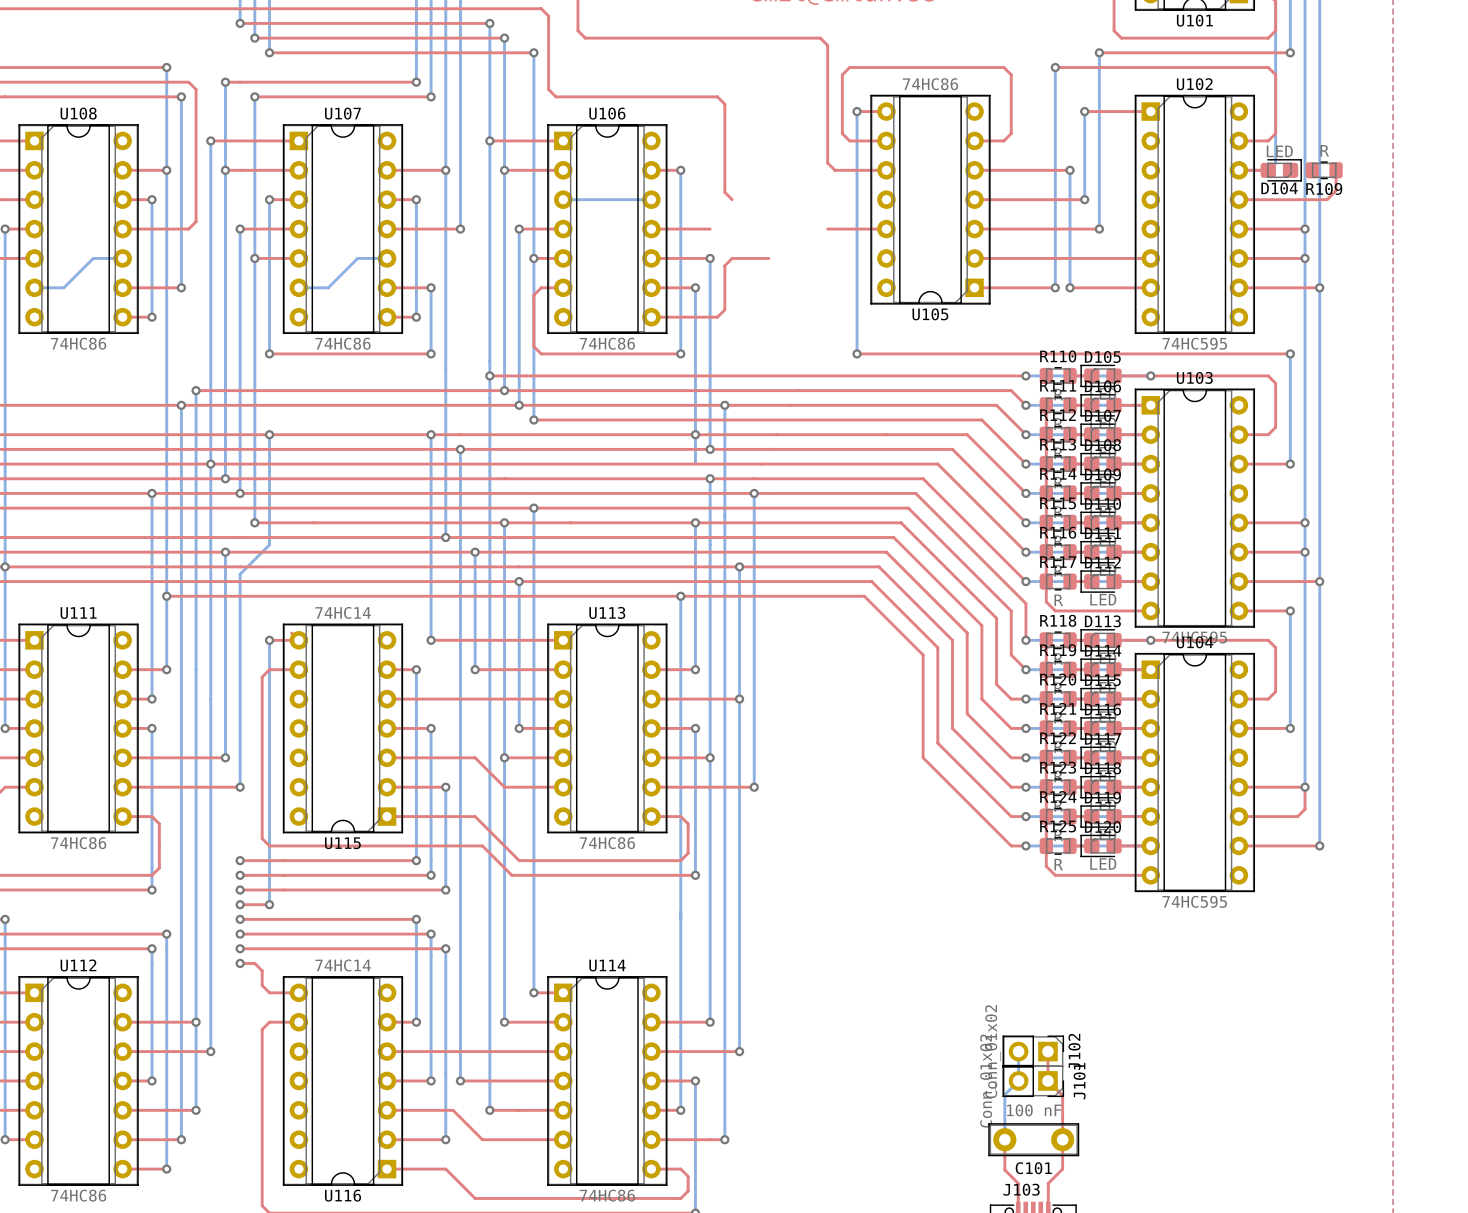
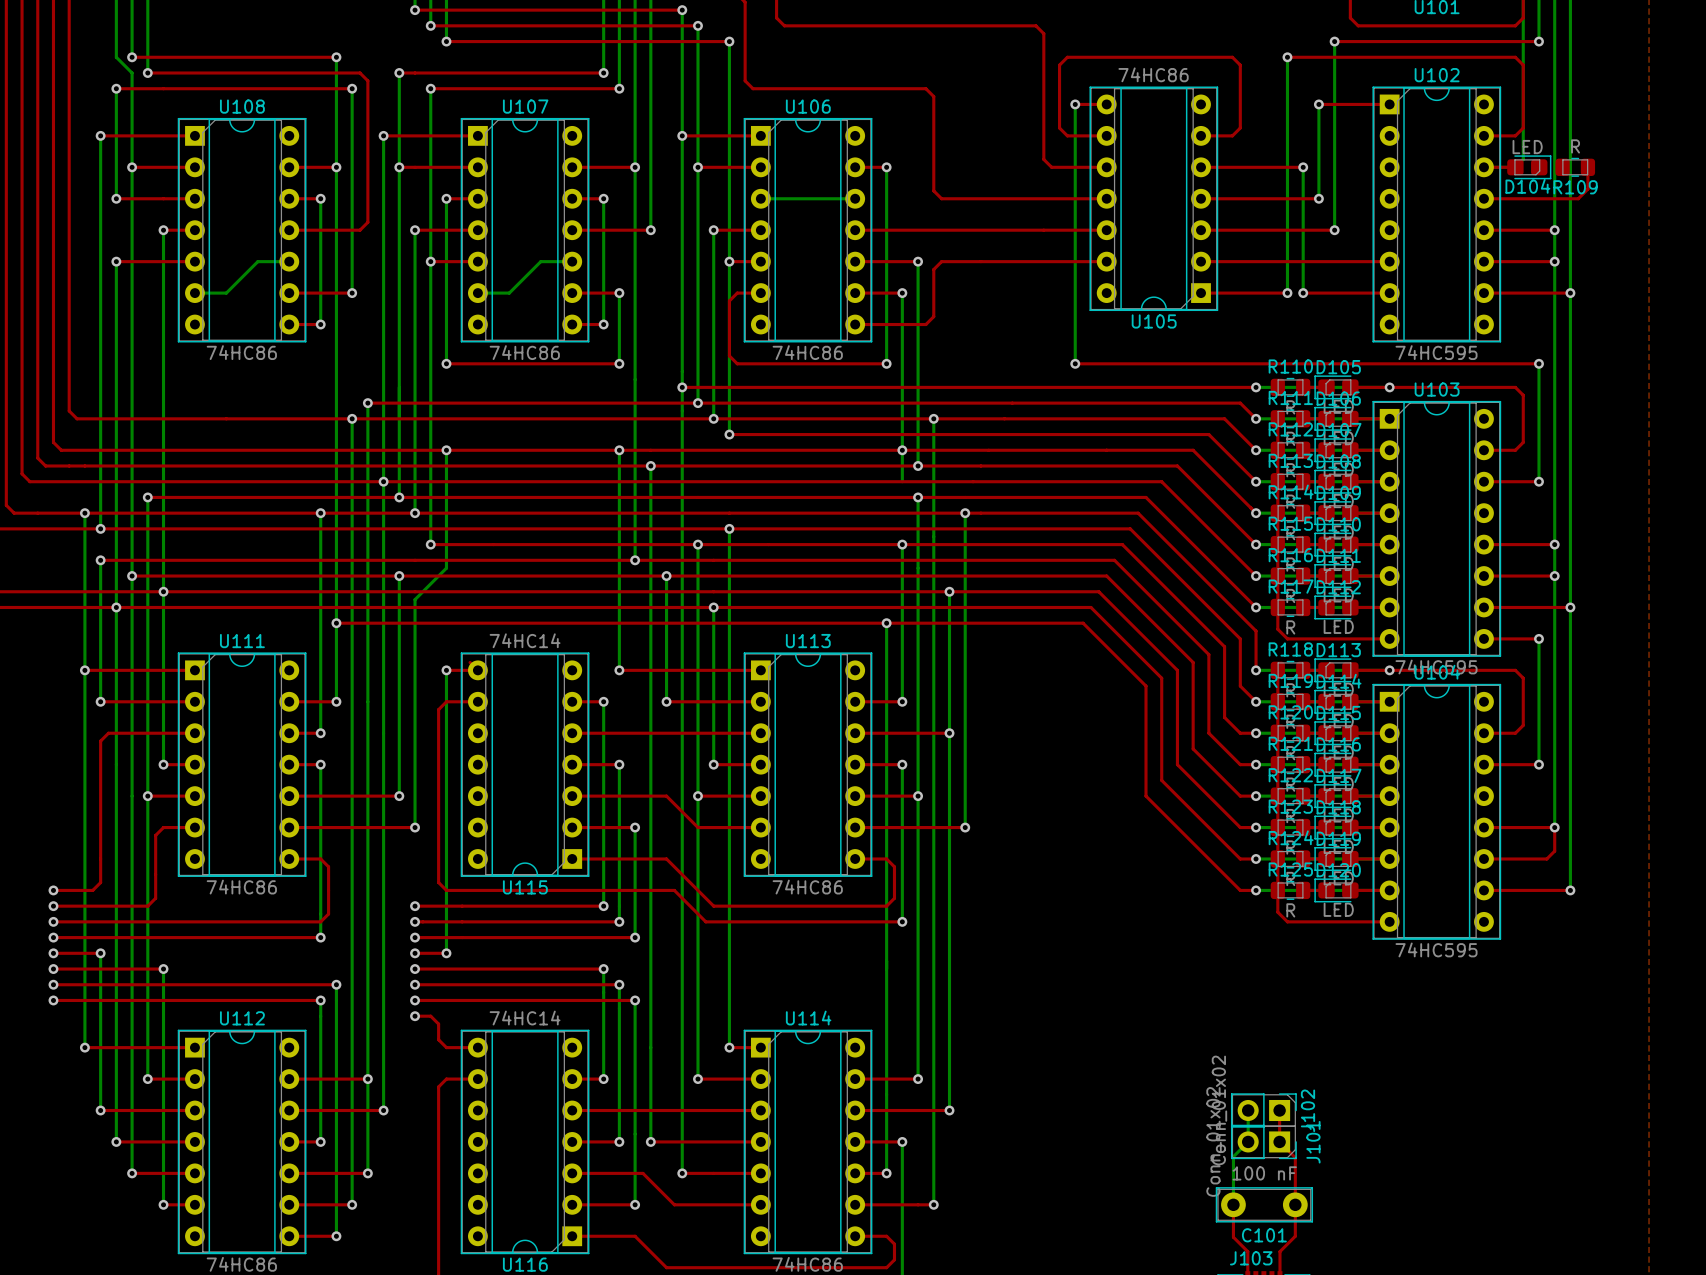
top track: none -> (941, 198) (1106, 198)
top track: none -> (918, 230) (1043, 230)
top track: none -> (980, 261) (1106, 261)

